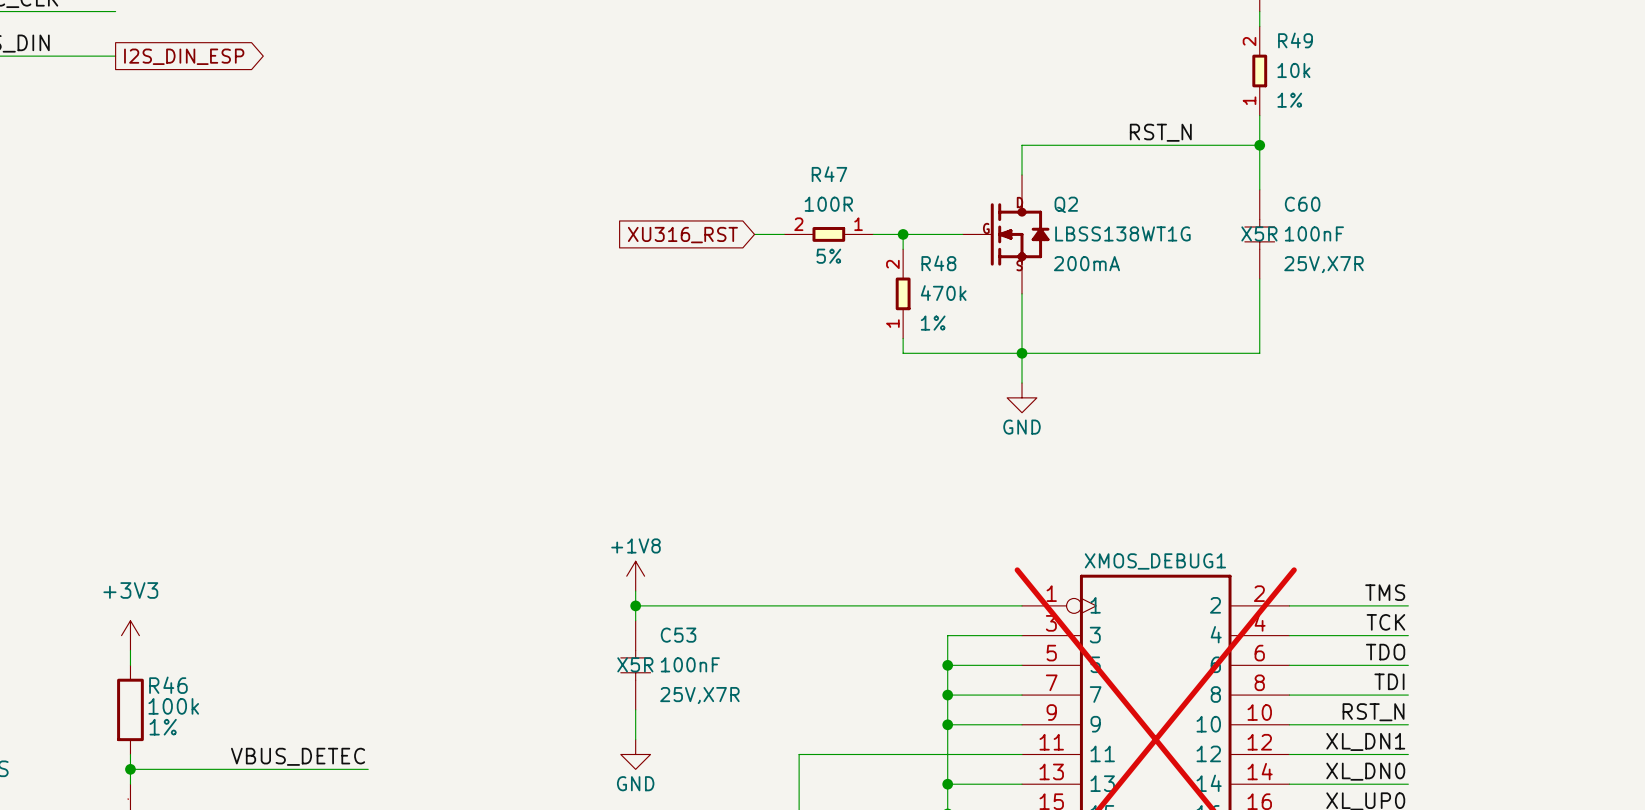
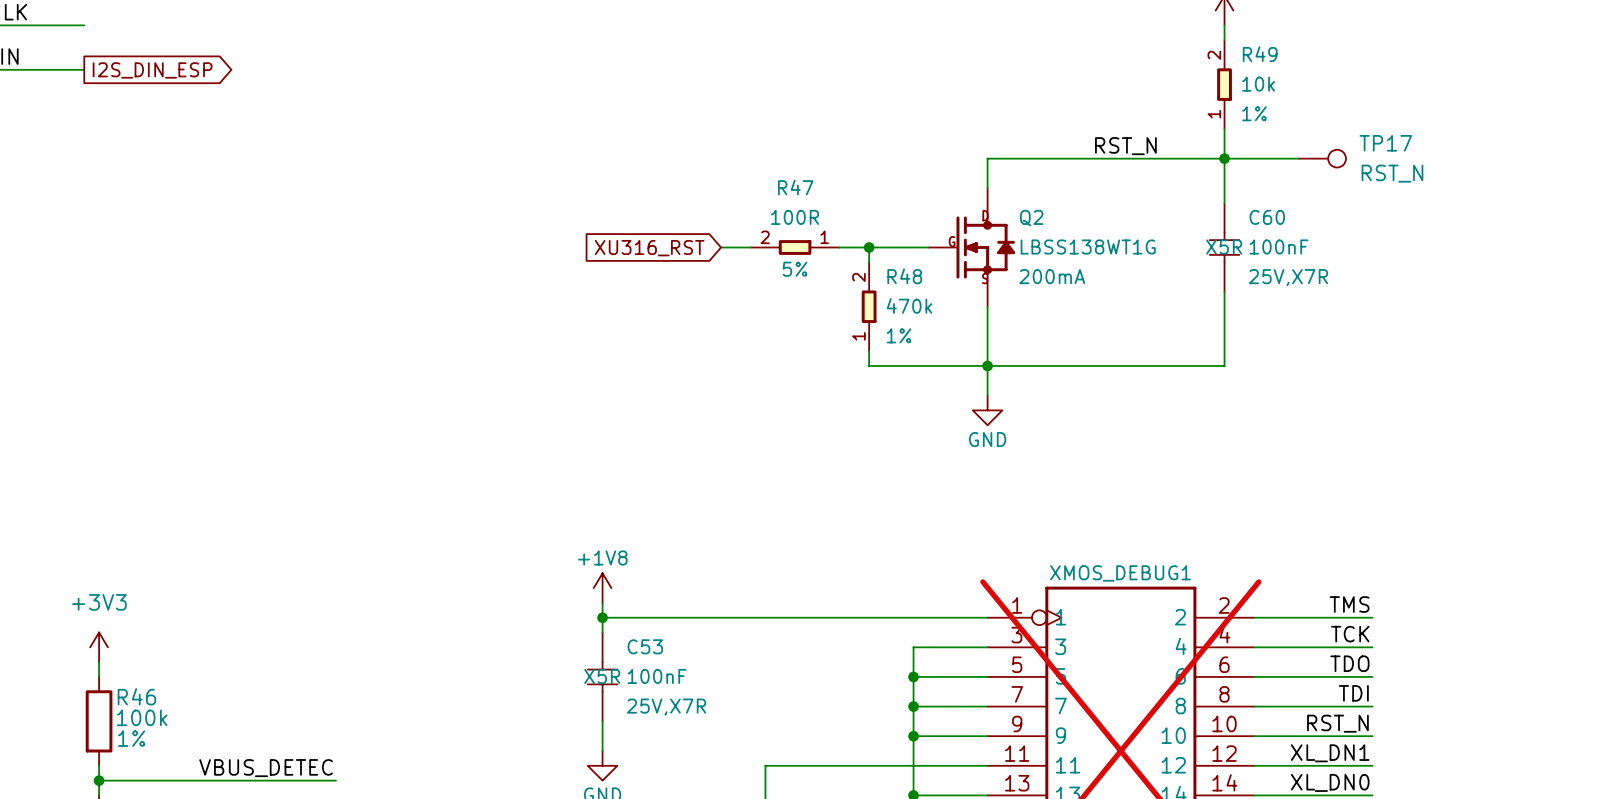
wire: none -> (1224, 158) (1298, 158)
TP17: none -> RST_N (1322, 158)

